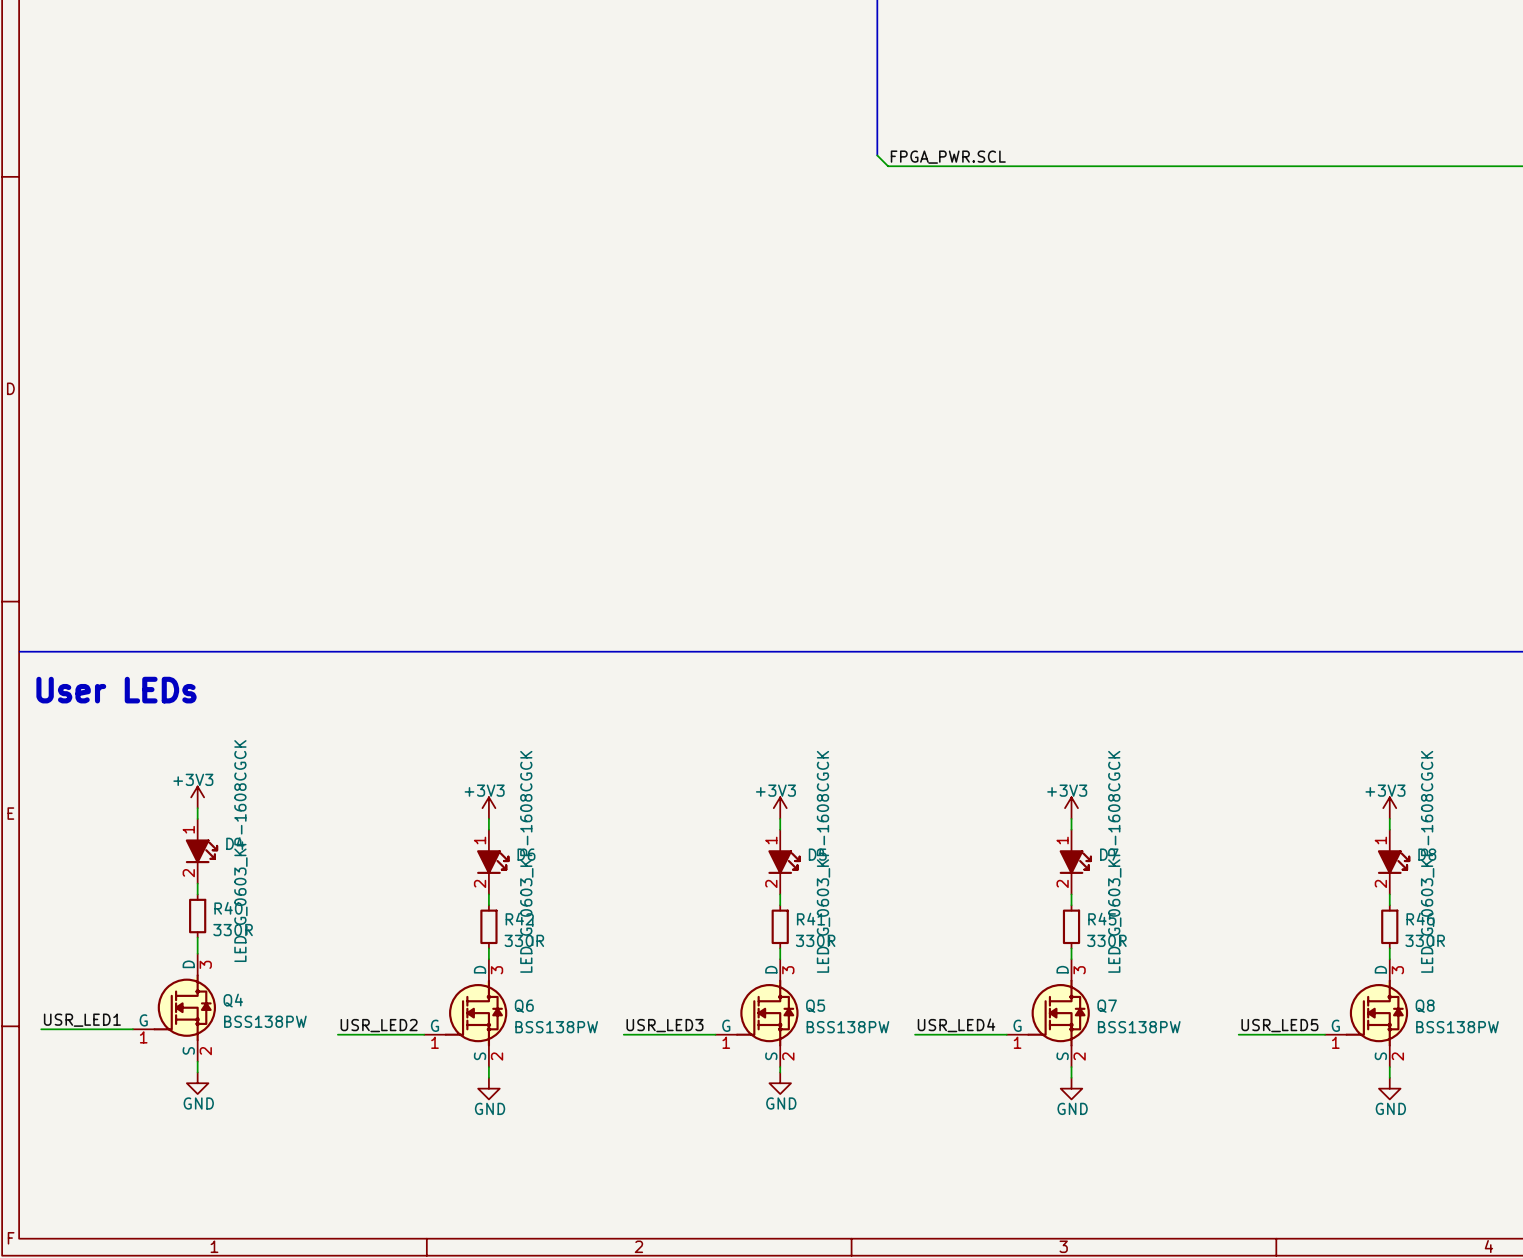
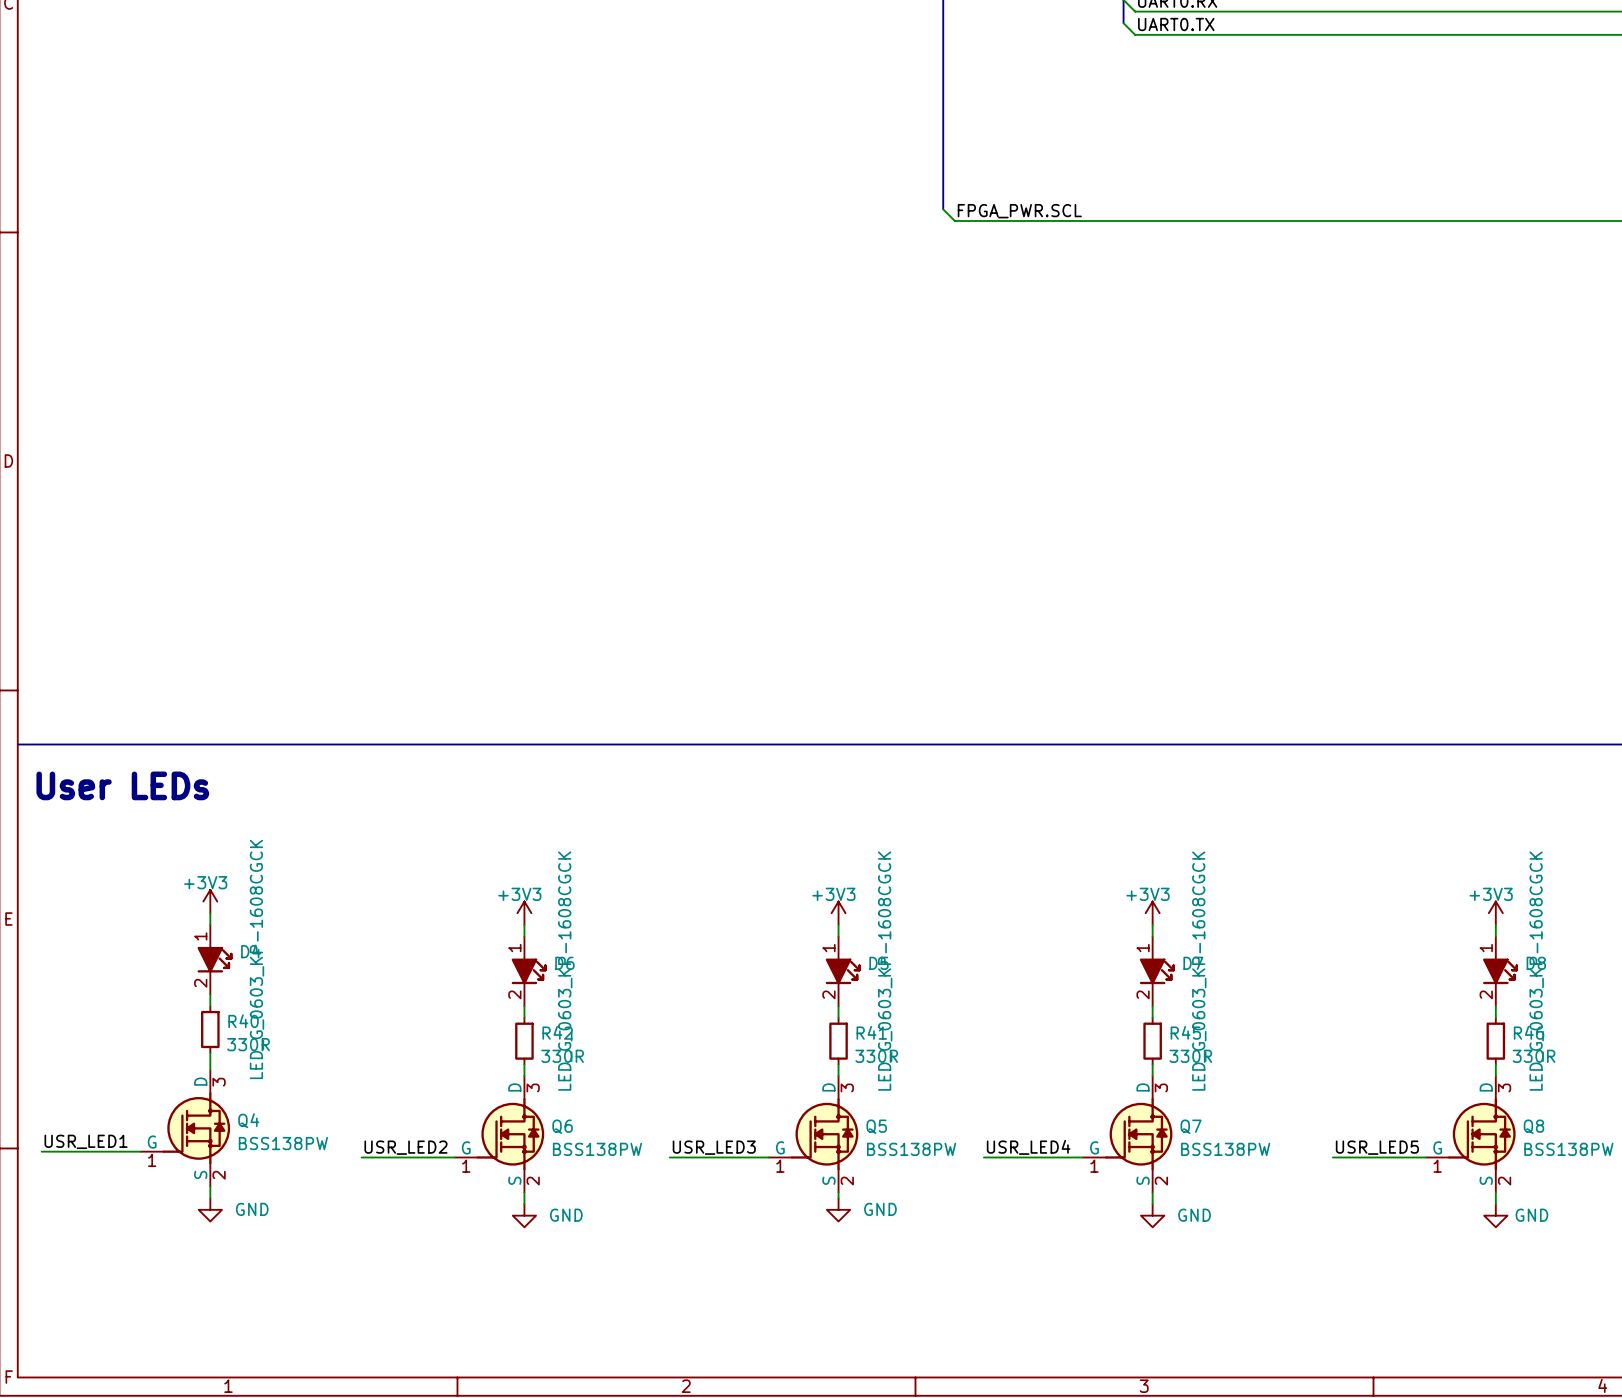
power symbol text position: GND (198, 1103) -> GND (252, 1209)
power symbol text position: GND (781, 1103) -> GND (880, 1209)
power symbol text position: GND (490, 1108) -> GND (566, 1215)
power symbol text position: GND (1072, 1108) -> GND (1194, 1215)
power symbol text position: GND (1390, 1108) -> GND (1531, 1215)

